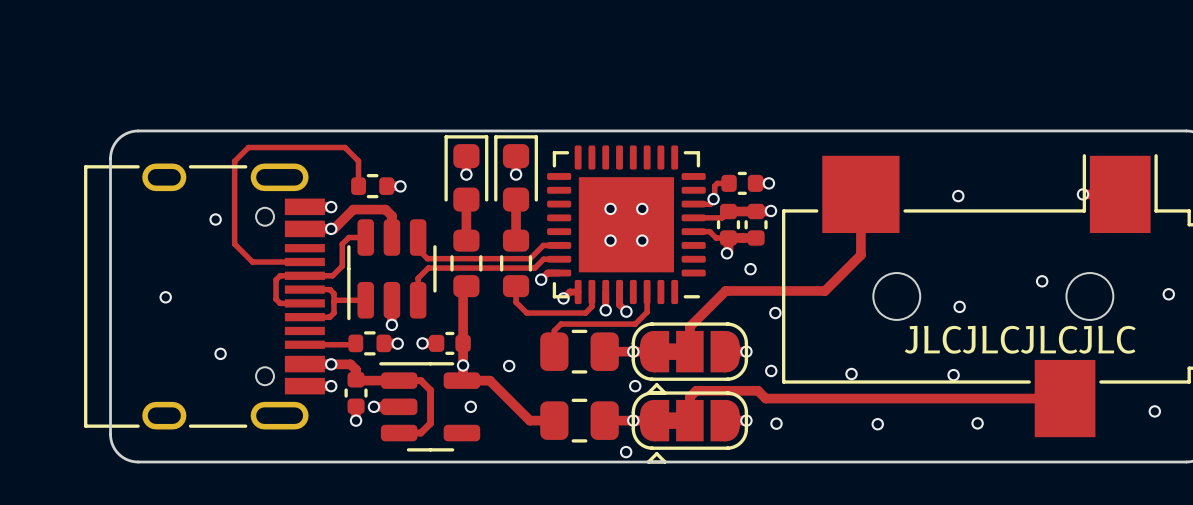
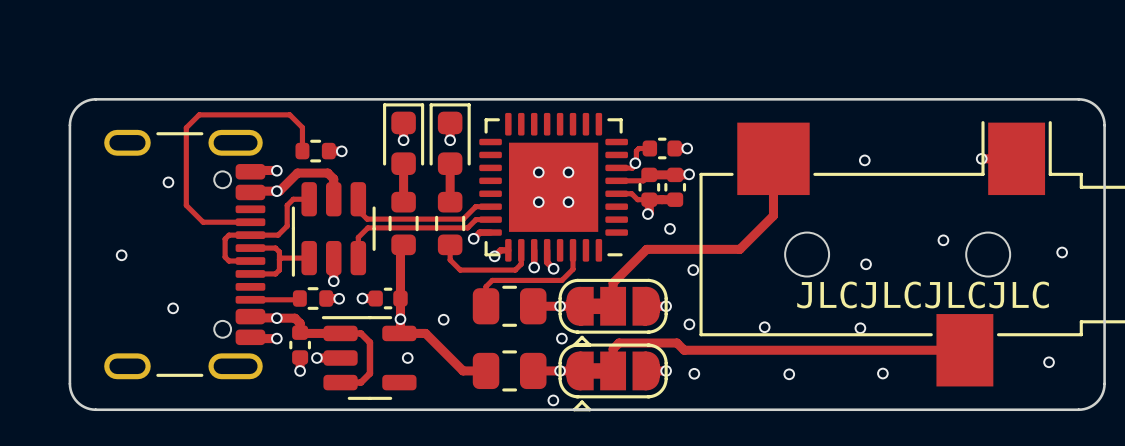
part: (204, 296) -> none
part: none -> (184, 254)

